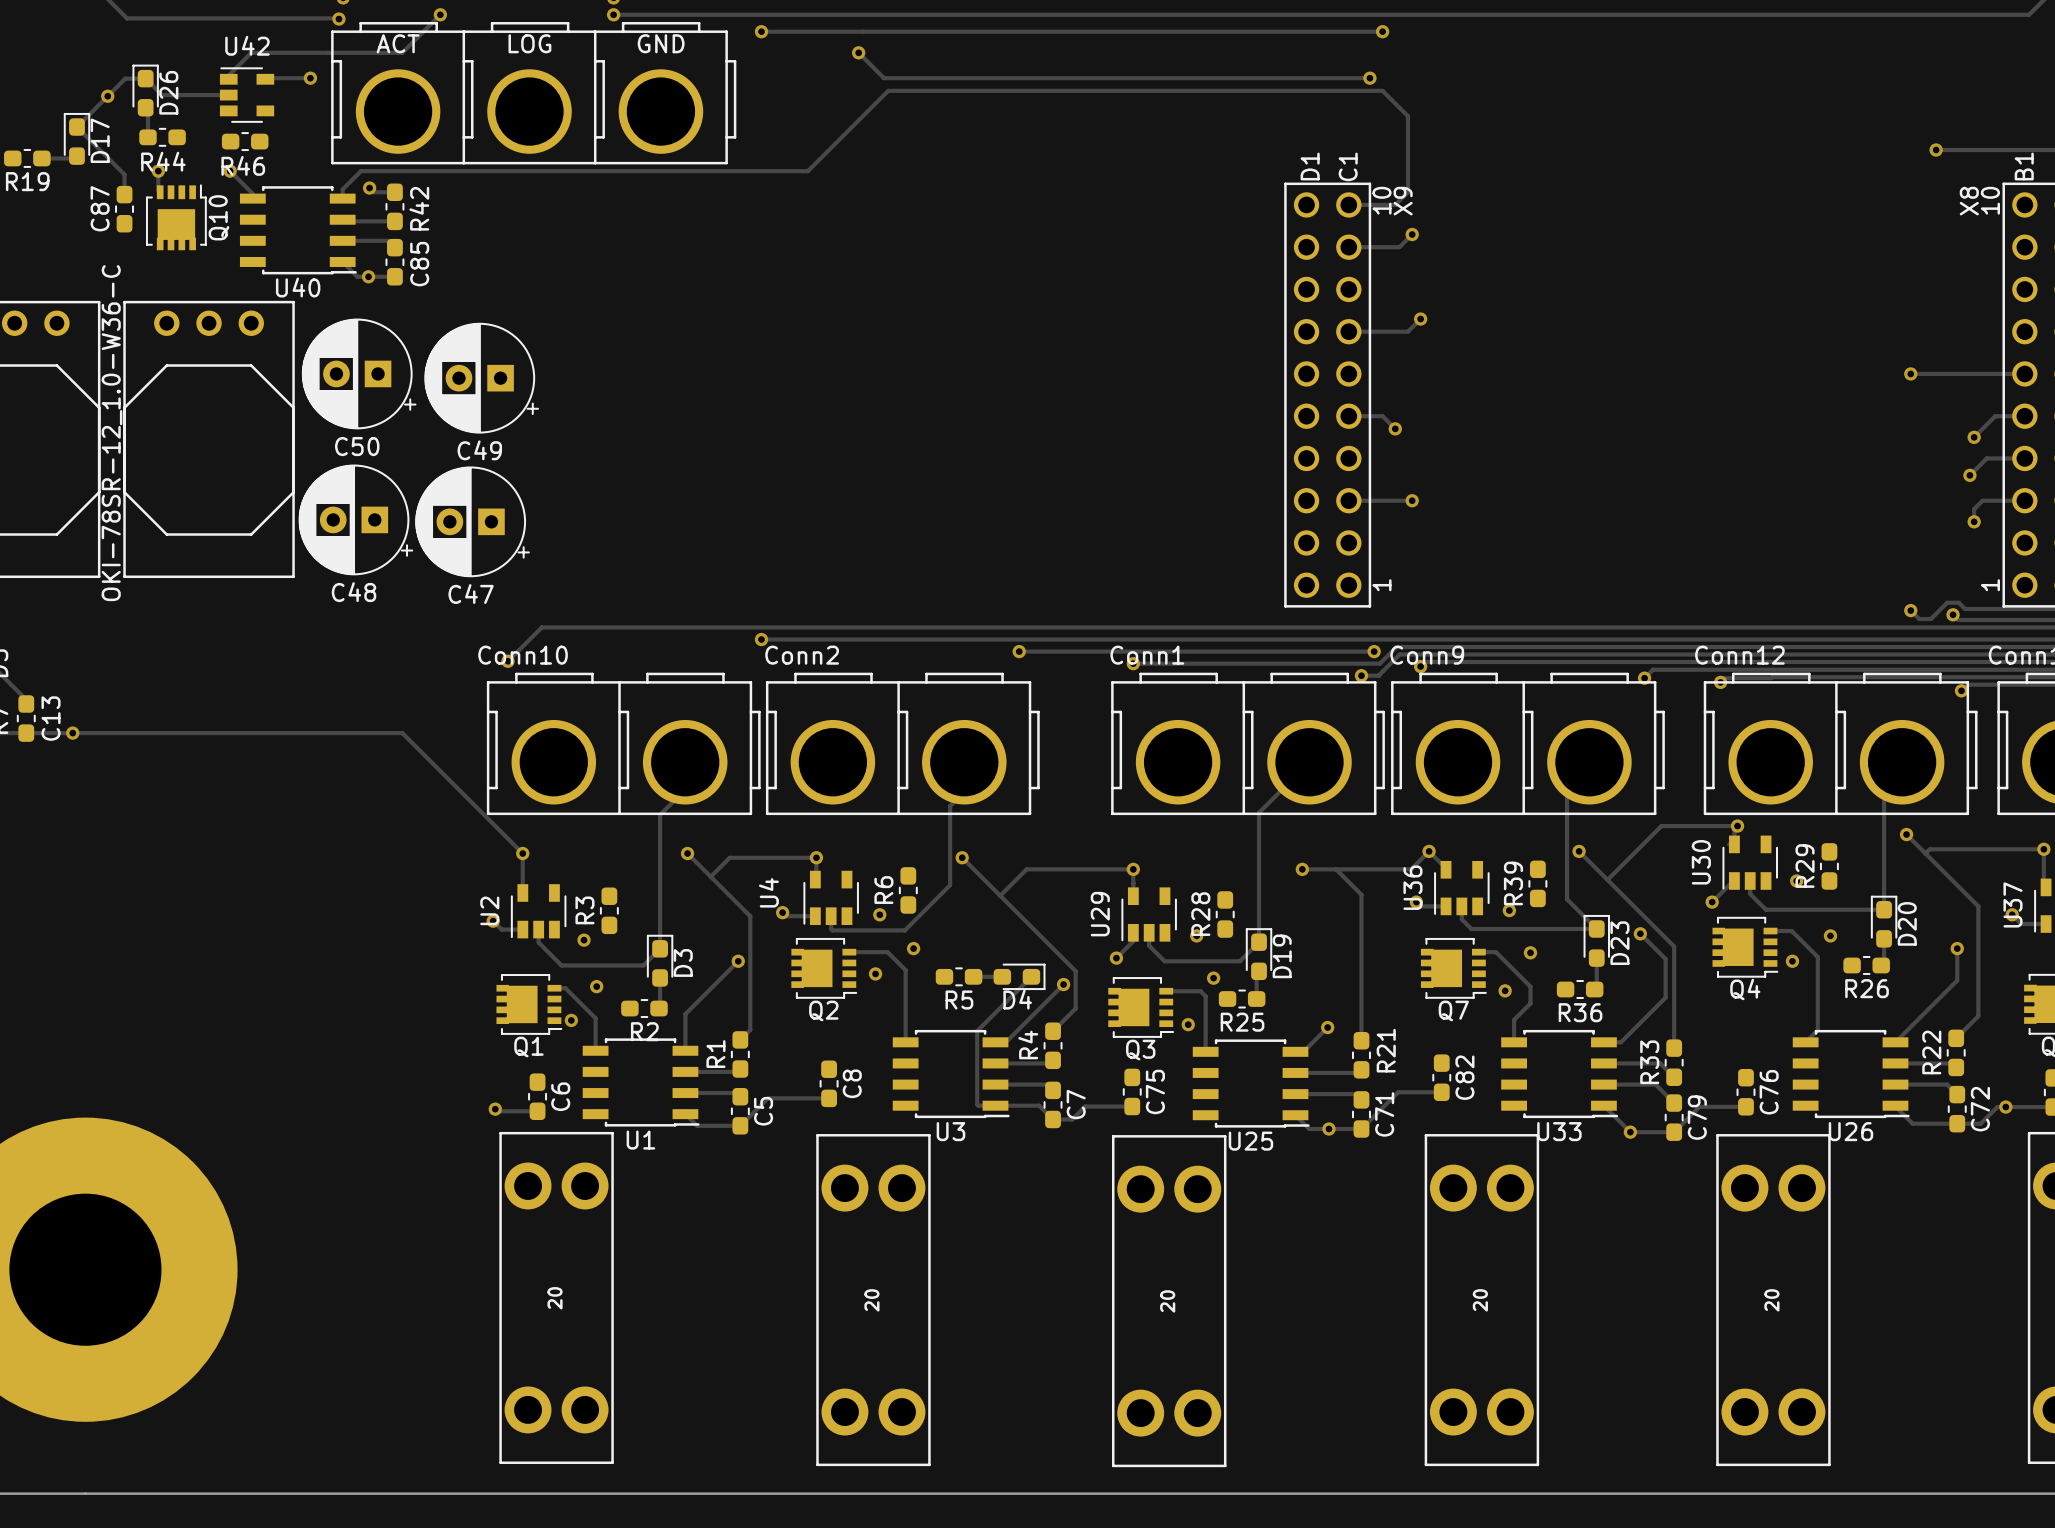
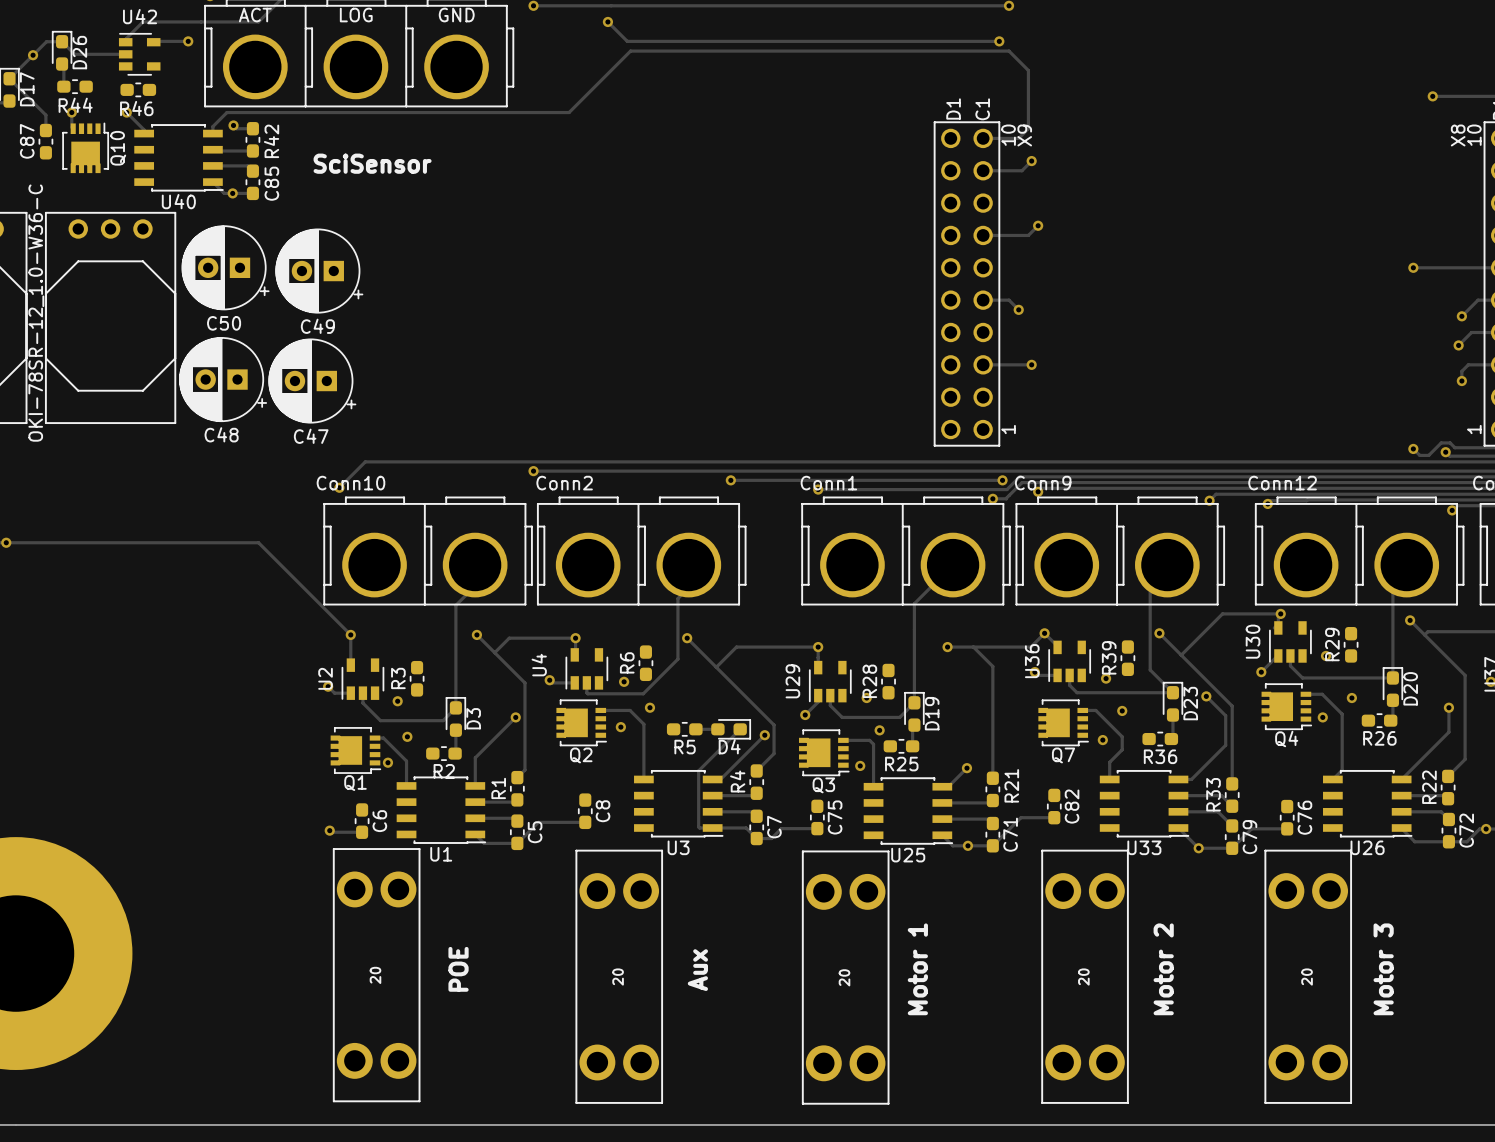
text: none -> SciSensor (372, 163)
text: none -> POE (458, 969)
text: none -> Motor 1 (917, 969)
text: none -> Motor 2 (1163, 969)
text: none -> Motor 3 (1383, 969)
text: none -> Aux (697, 970)

